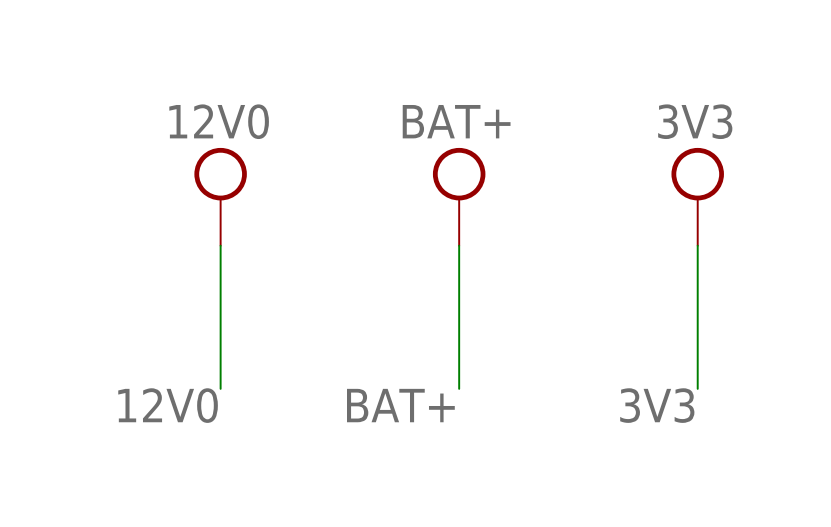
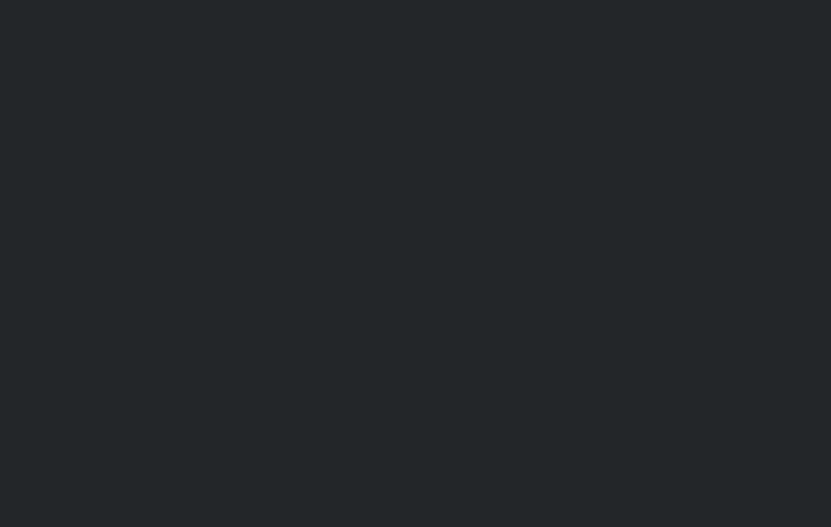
power symbol: 12V0 (220, 196) -> none
power symbol: BAT+ (459, 196) -> none
power symbol: 3V3 (697, 196) -> none
wire: (220, 245) (220, 388) -> none
wire: (459, 245) (459, 388) -> none
wire: (697, 245) (697, 388) -> none
label: 12V0 (168, 405) -> none
label: BAT+ (400, 405) -> none
label: 3V3 (657, 405) -> none

